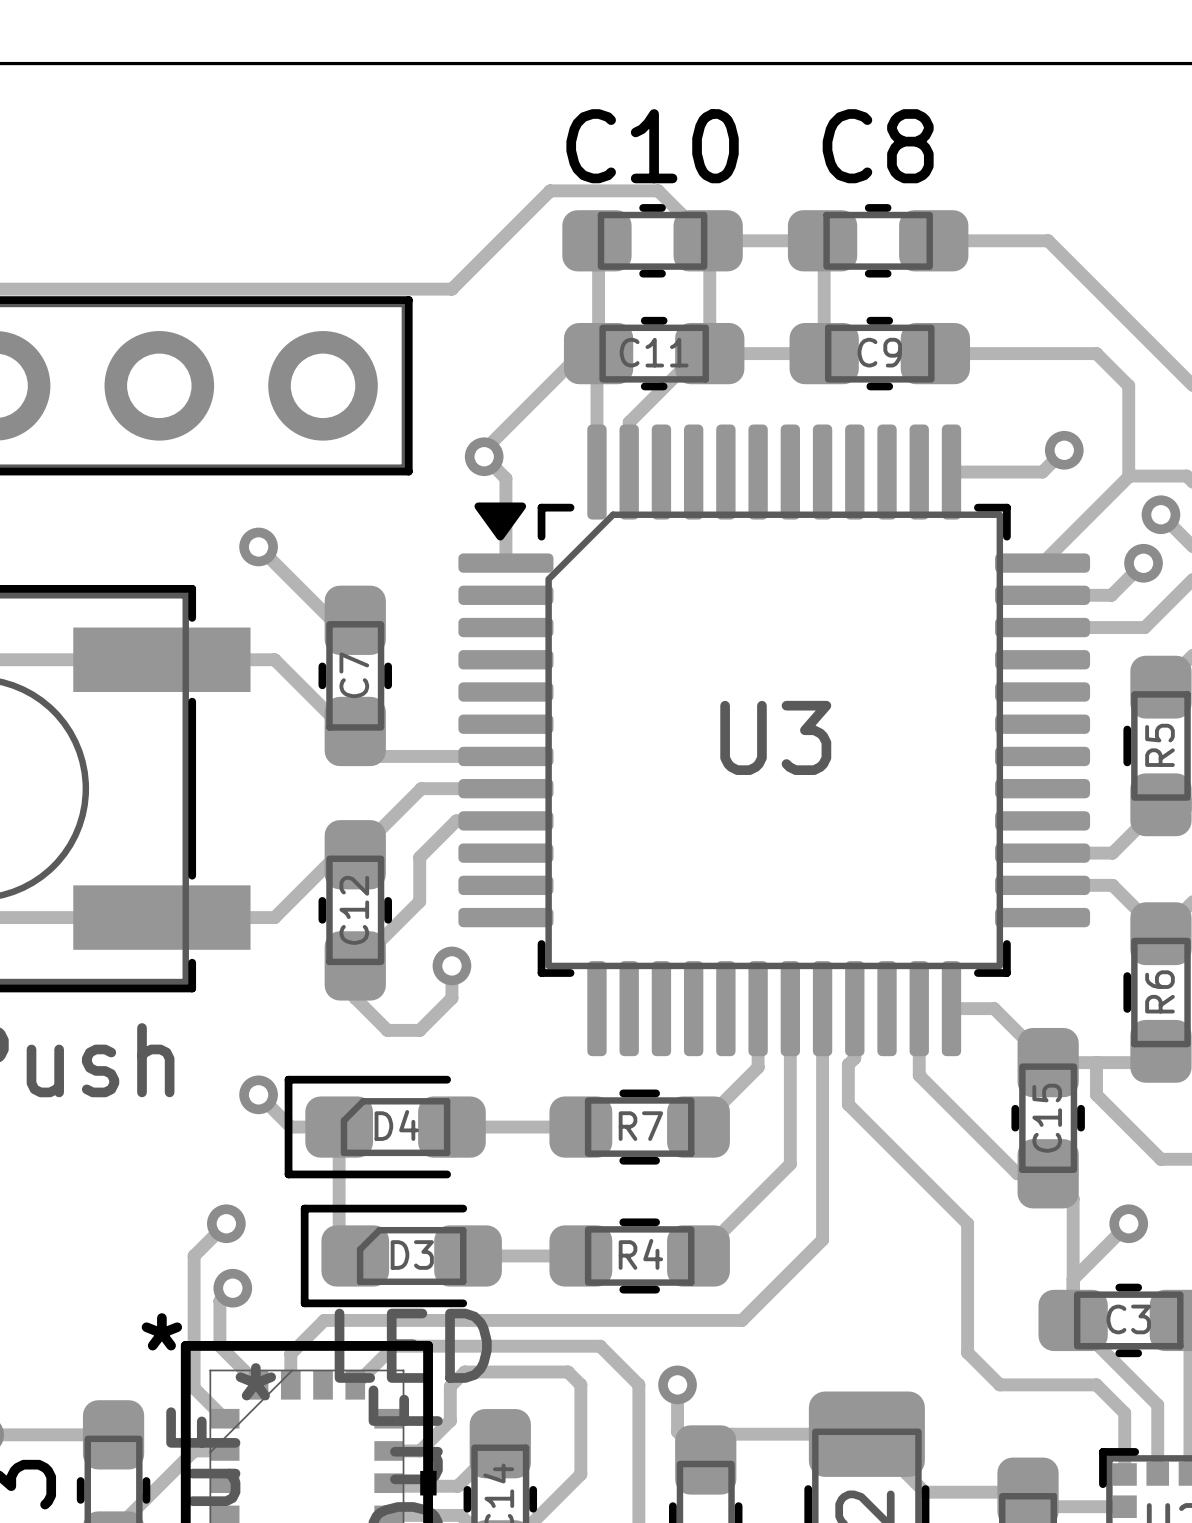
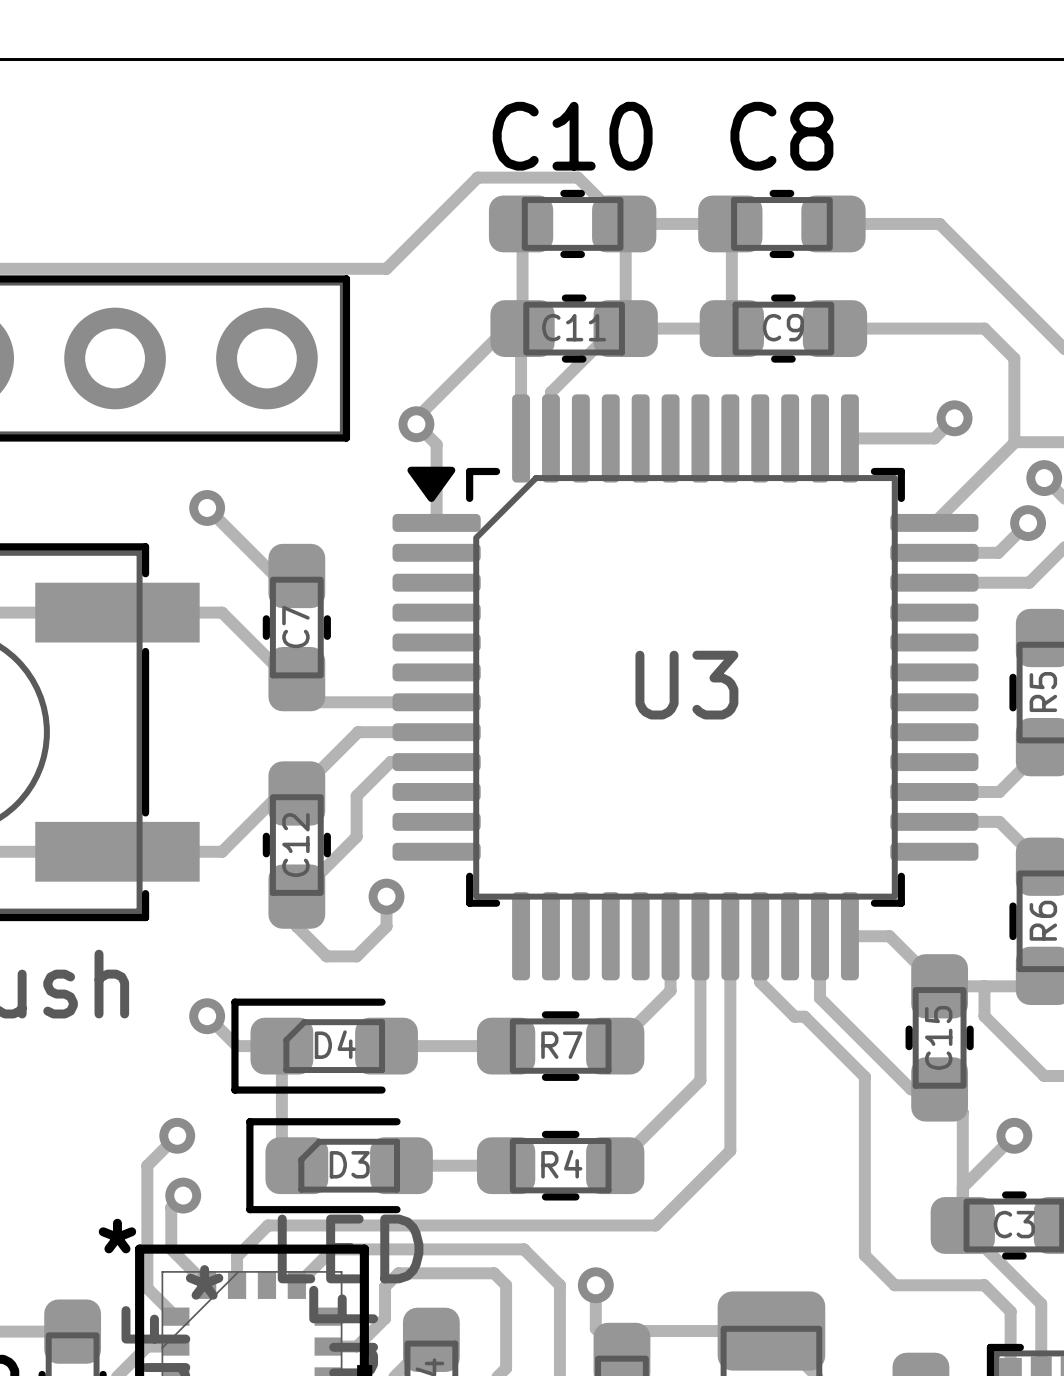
track: (854, 1058) (848, 1064) (848, 1104) (967, 1223) -> (760, 982) (794, 1016) (804, 1016) (864, 1076) (864, 1135)

